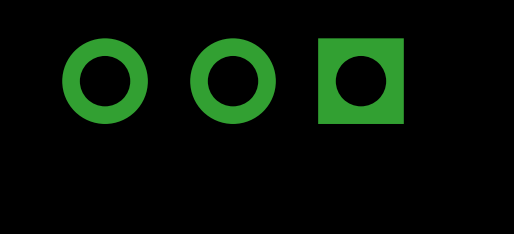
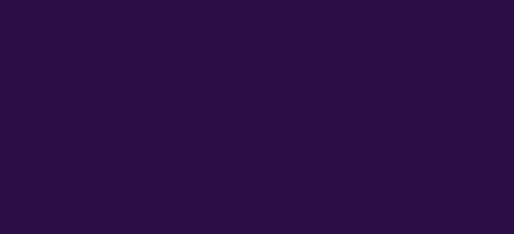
part: (233, 81) -> none

